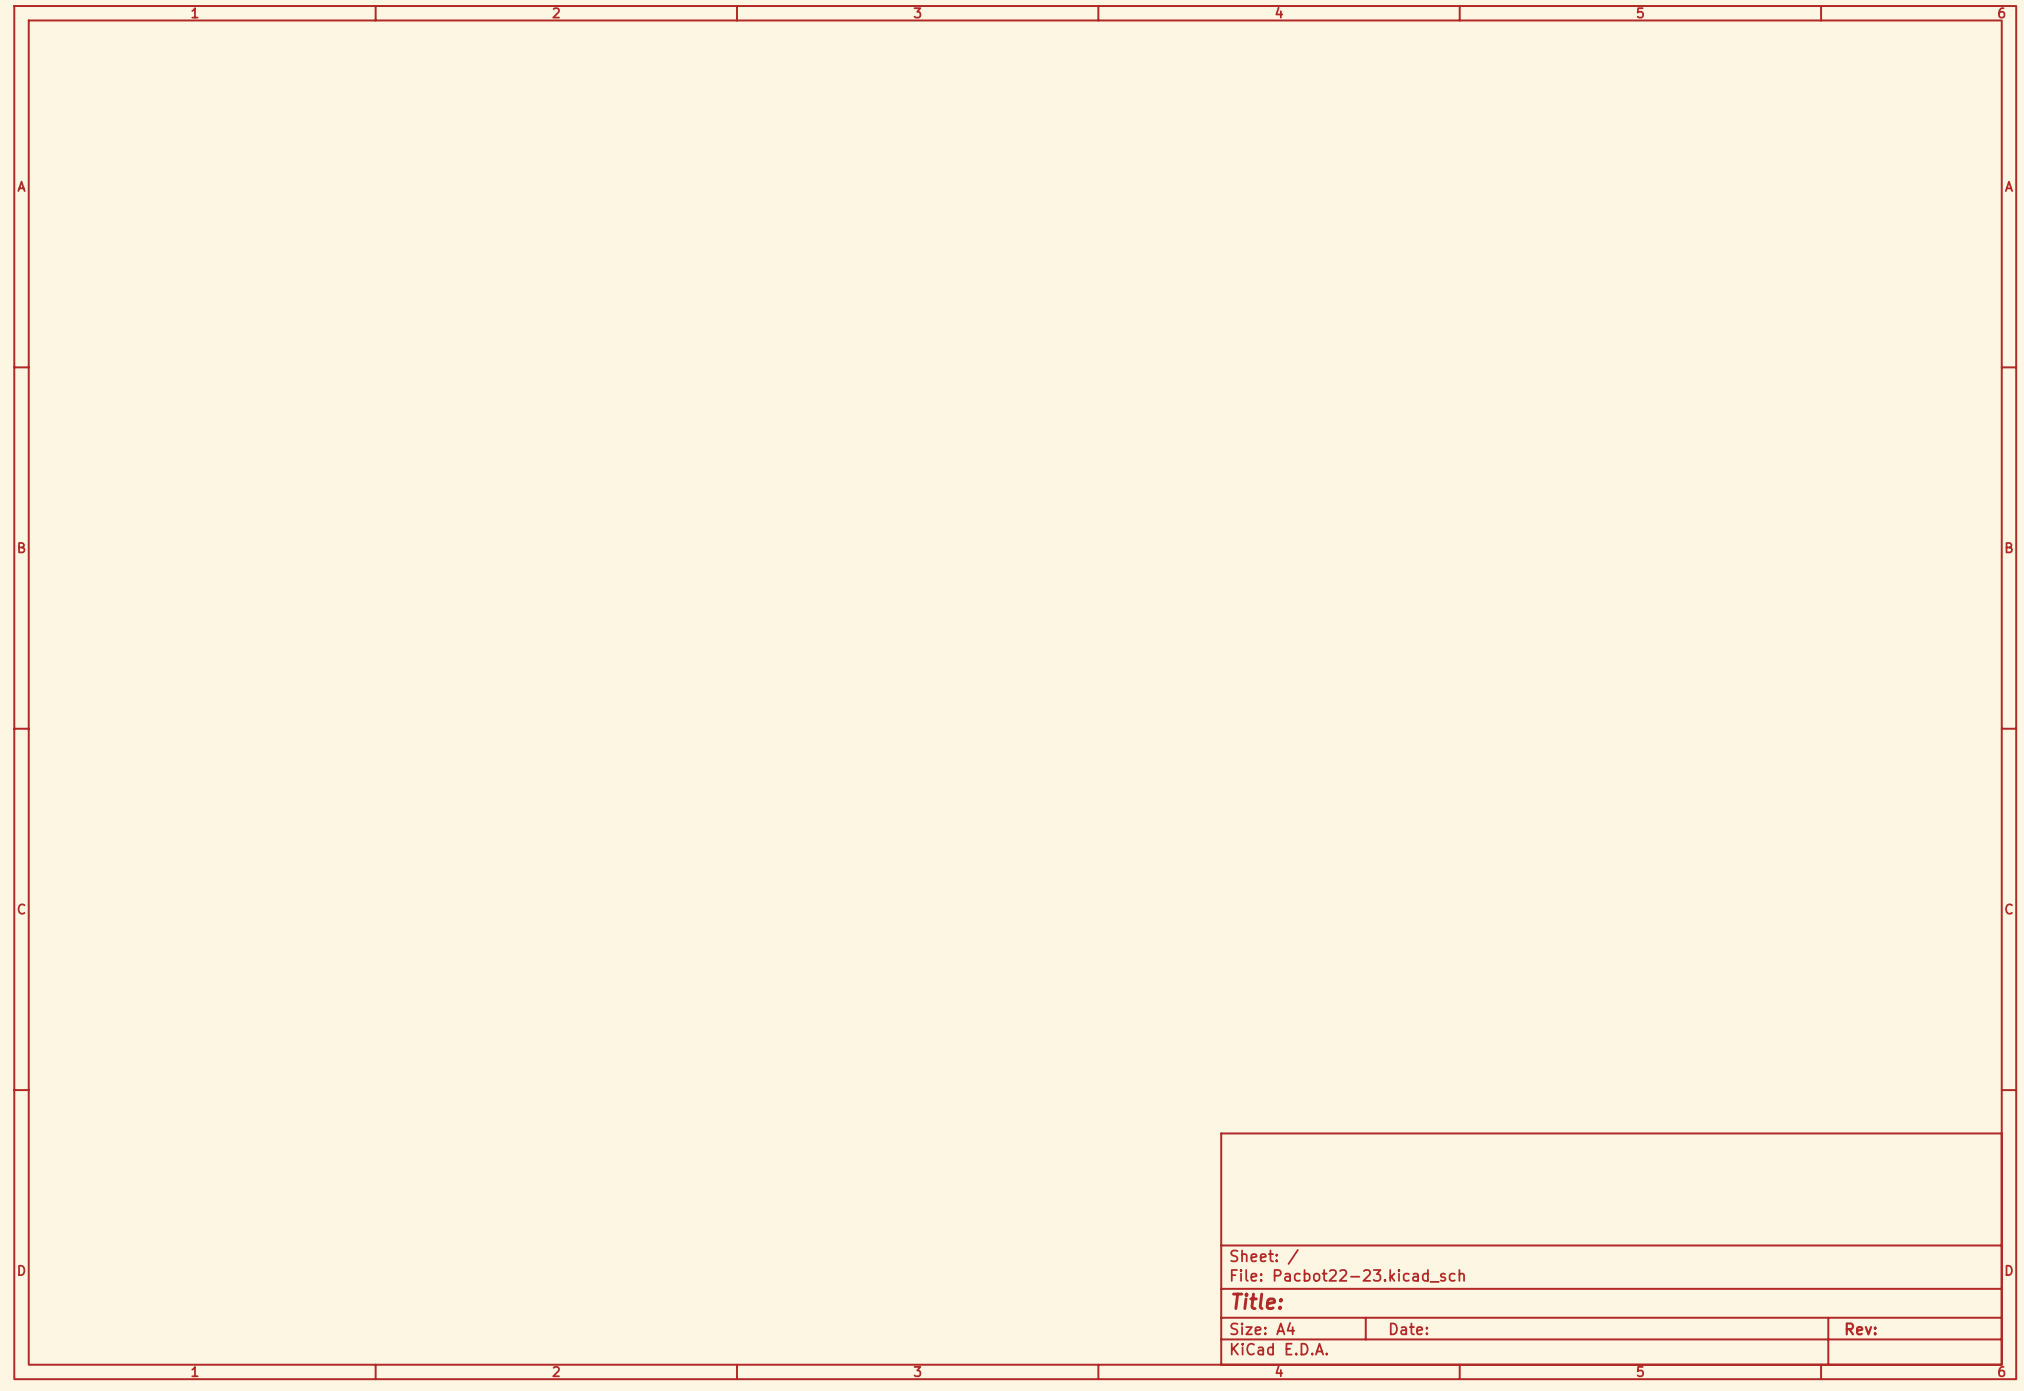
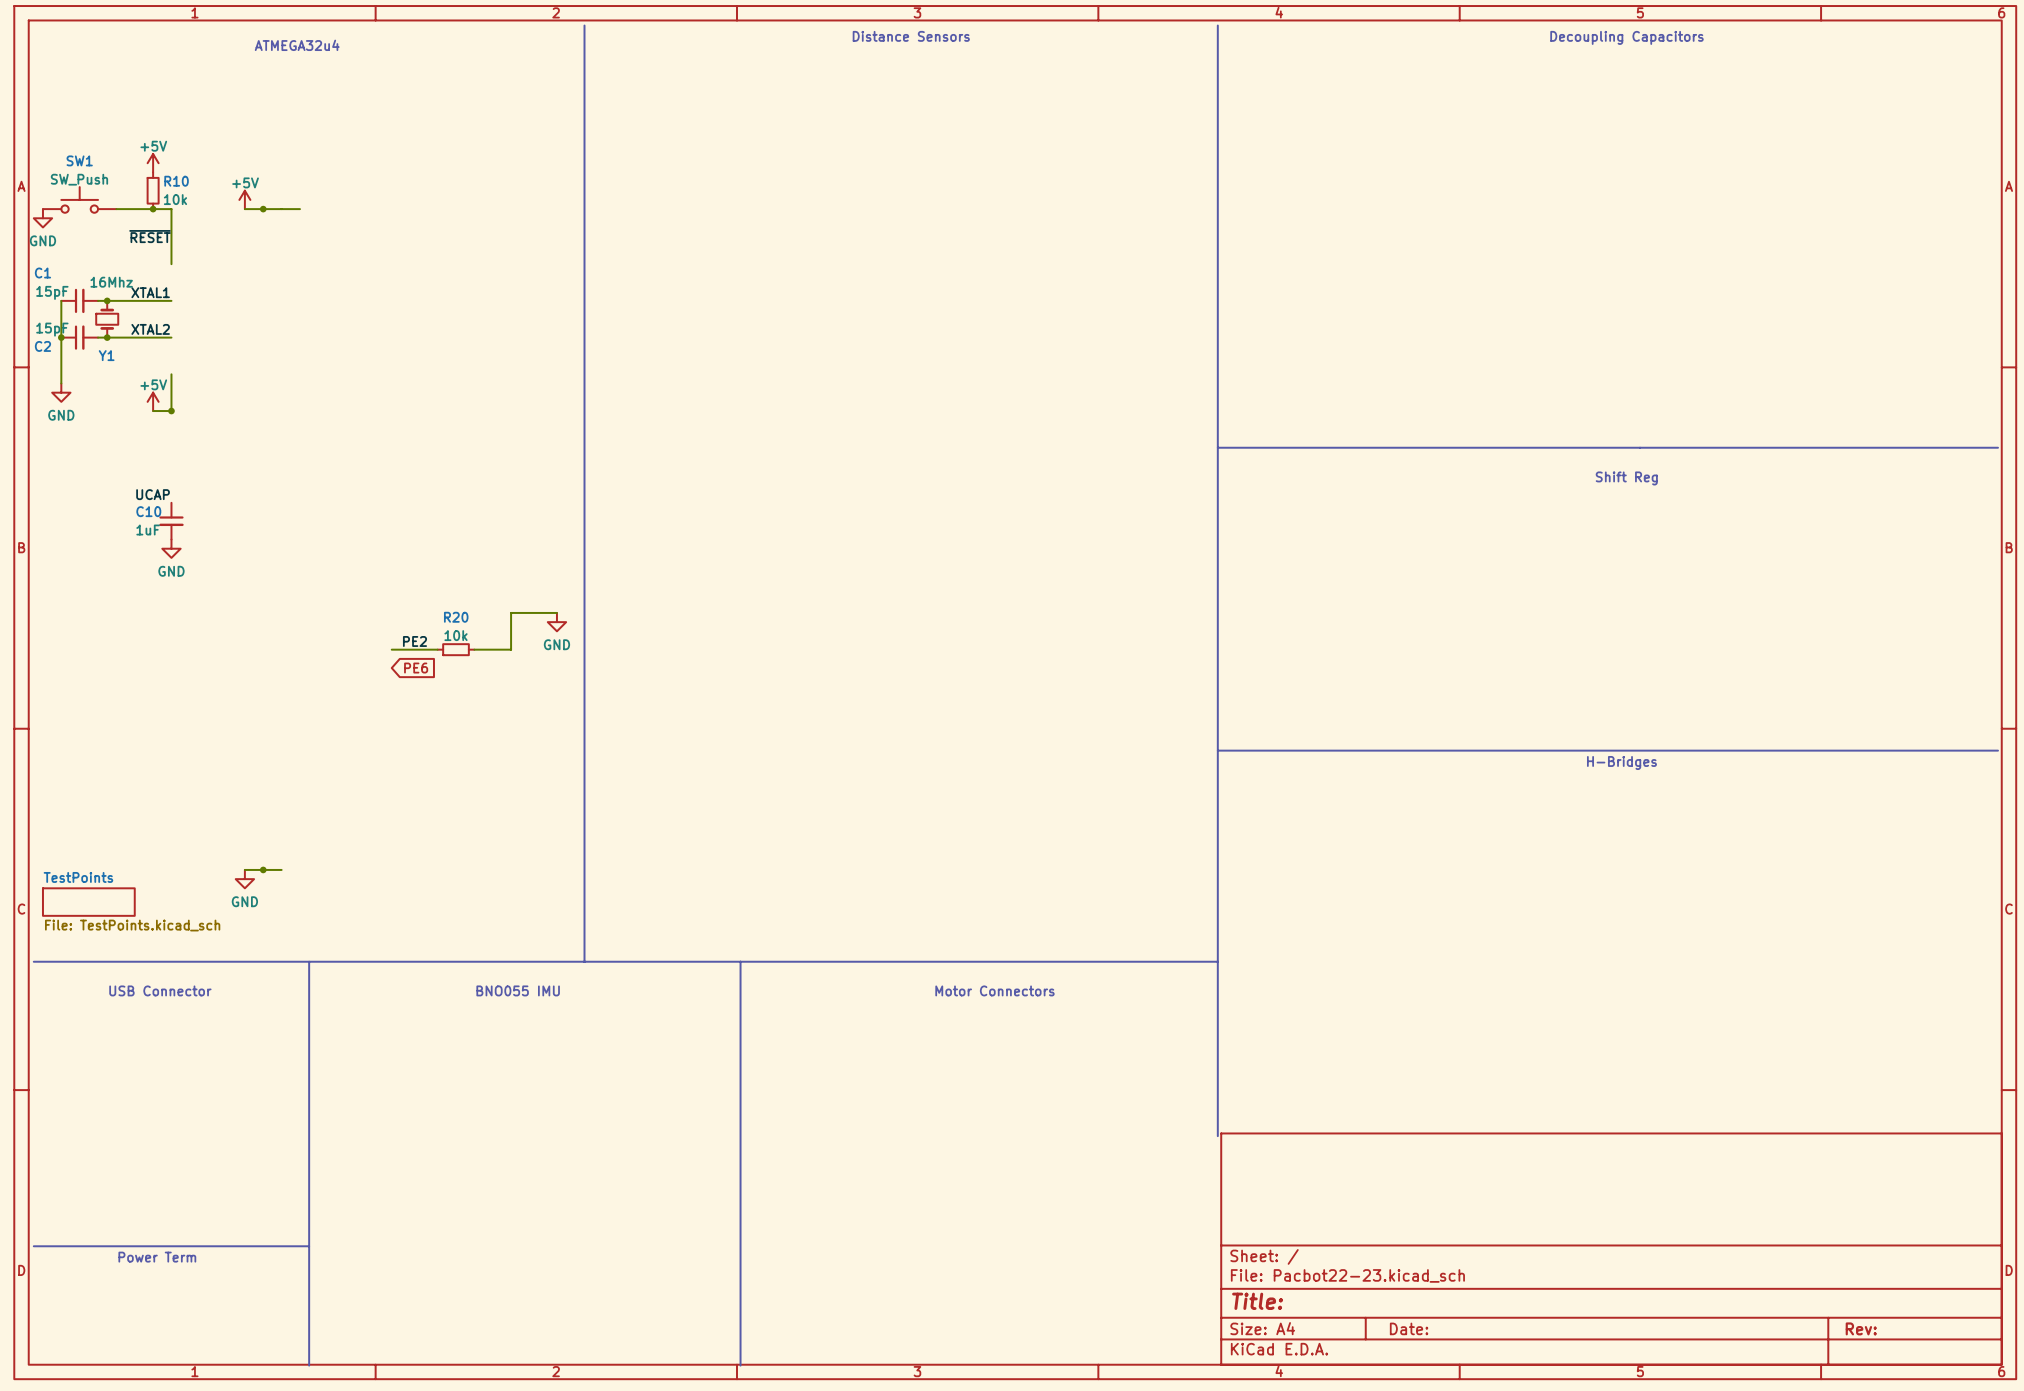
line: none -> (584, 25) (584, 961)
line: none -> (1217, 25) (1217, 1136)
text: none -> Distance Sensors (911, 36)
text: none -> Decoupling Capacitors (1626, 37)
text: none -> ATMEGA32u4 (297, 45)
power symbol: none -> +5V (153, 163)
R10: none -> 10k (153, 190)
SW1: none -> SW_Push (79, 199)
power symbol: none -> +5V (244, 199)
wire: none -> (116, 209) (171, 209) (171, 264)
junction: none -> (153, 209)
wire: none -> (244, 209) (299, 209)
junction: none -> (263, 209)
power symbol: none -> GND (42, 218)
label: none -> ~{RESET} (150, 236)
label: none -> XTAL1 (150, 292)
wire: none -> (61, 300) (61, 383)
C1: none -> 15pF (79, 300)
wire: none -> (98, 300) (171, 300)
junction: none -> (107, 300)
Y1: none -> 16Mhz (107, 319)
label: none -> XTAL2 (150, 329)
junction: none -> (61, 337)
C2: none -> 15pF (79, 337)
wire: none -> (98, 337) (171, 337)
junction: none -> (107, 337)
wire: none -> (171, 374) (171, 411) (153, 411)
power symbol: none -> GND (61, 392)
power symbol: none -> +5V (153, 401)
junction: none -> (171, 411)
line: none -> (1217, 447) (1997, 447)
text: none -> Shift Reg (1626, 478)
label: none -> UCAP (153, 494)
C10: none -> 1uF (171, 521)
power symbol: none -> GND (171, 548)
wire: none -> (556, 612) (511, 612) (511, 649) (474, 649)
power symbol: none -> GND (556, 622)
label: none -> PE2 (414, 641)
wire: none -> (391, 649) (437, 649)
R20: none -> 10k (456, 649)
global label: none -> PE6 (416, 668)
line: none -> (1217, 750) (1997, 750)
text: none -> H-Bridges (1621, 763)
wire: none -> (244, 869) (281, 869)
junction: none -> (263, 869)
power symbol: none -> GND (244, 879)
sheet TestPoints: none -> File: TestPoints.kicad_sch (88, 902)
line: none -> (33, 961) (1217, 961)
line: none -> (309, 961) (309, 1365)
line: none -> (740, 961) (740, 1365)
text: none -> USB Connector (160, 990)
text: none -> BNO055 IMU (518, 990)
text: none -> Motor Connectors (994, 990)
line: none -> (33, 1246) (309, 1246)
text: none -> Power Term (157, 1257)

